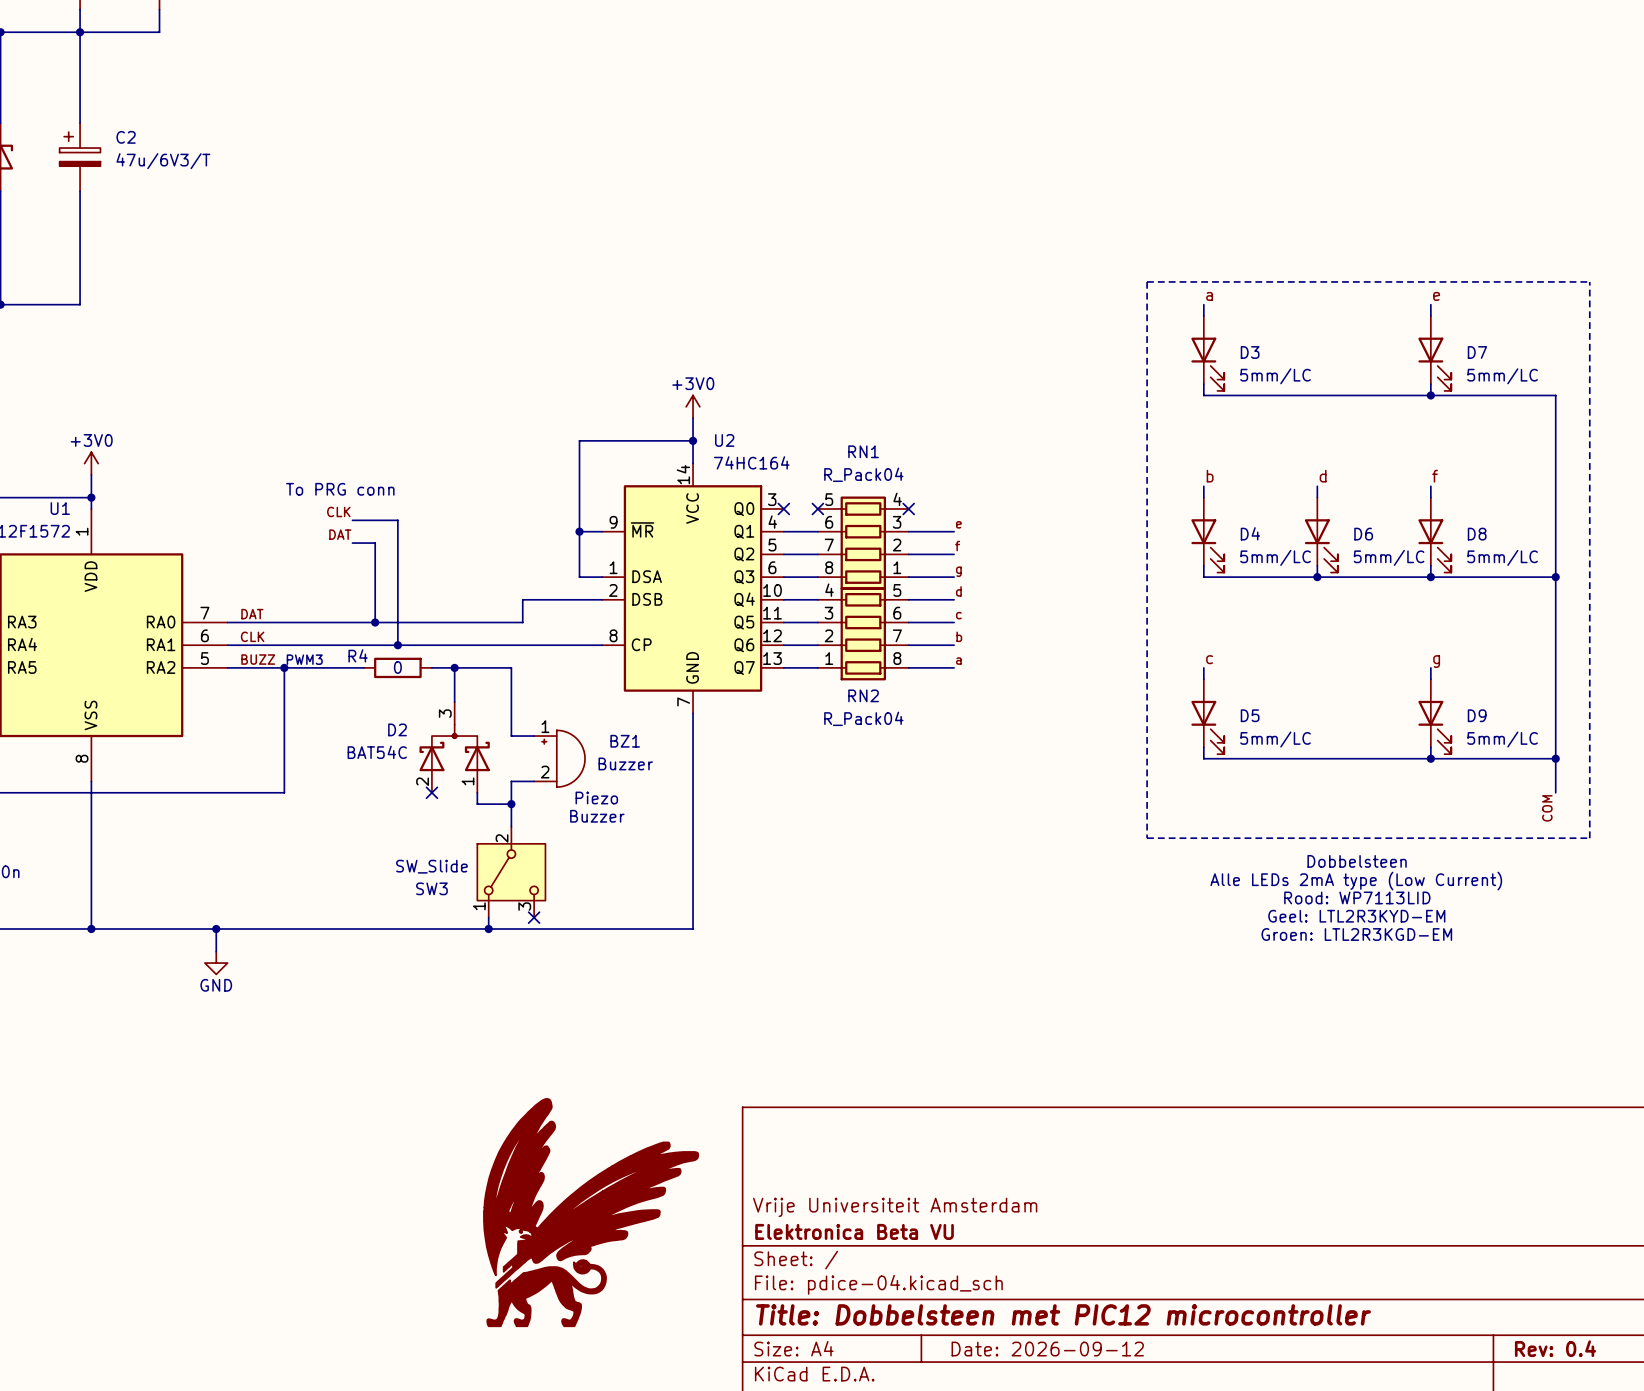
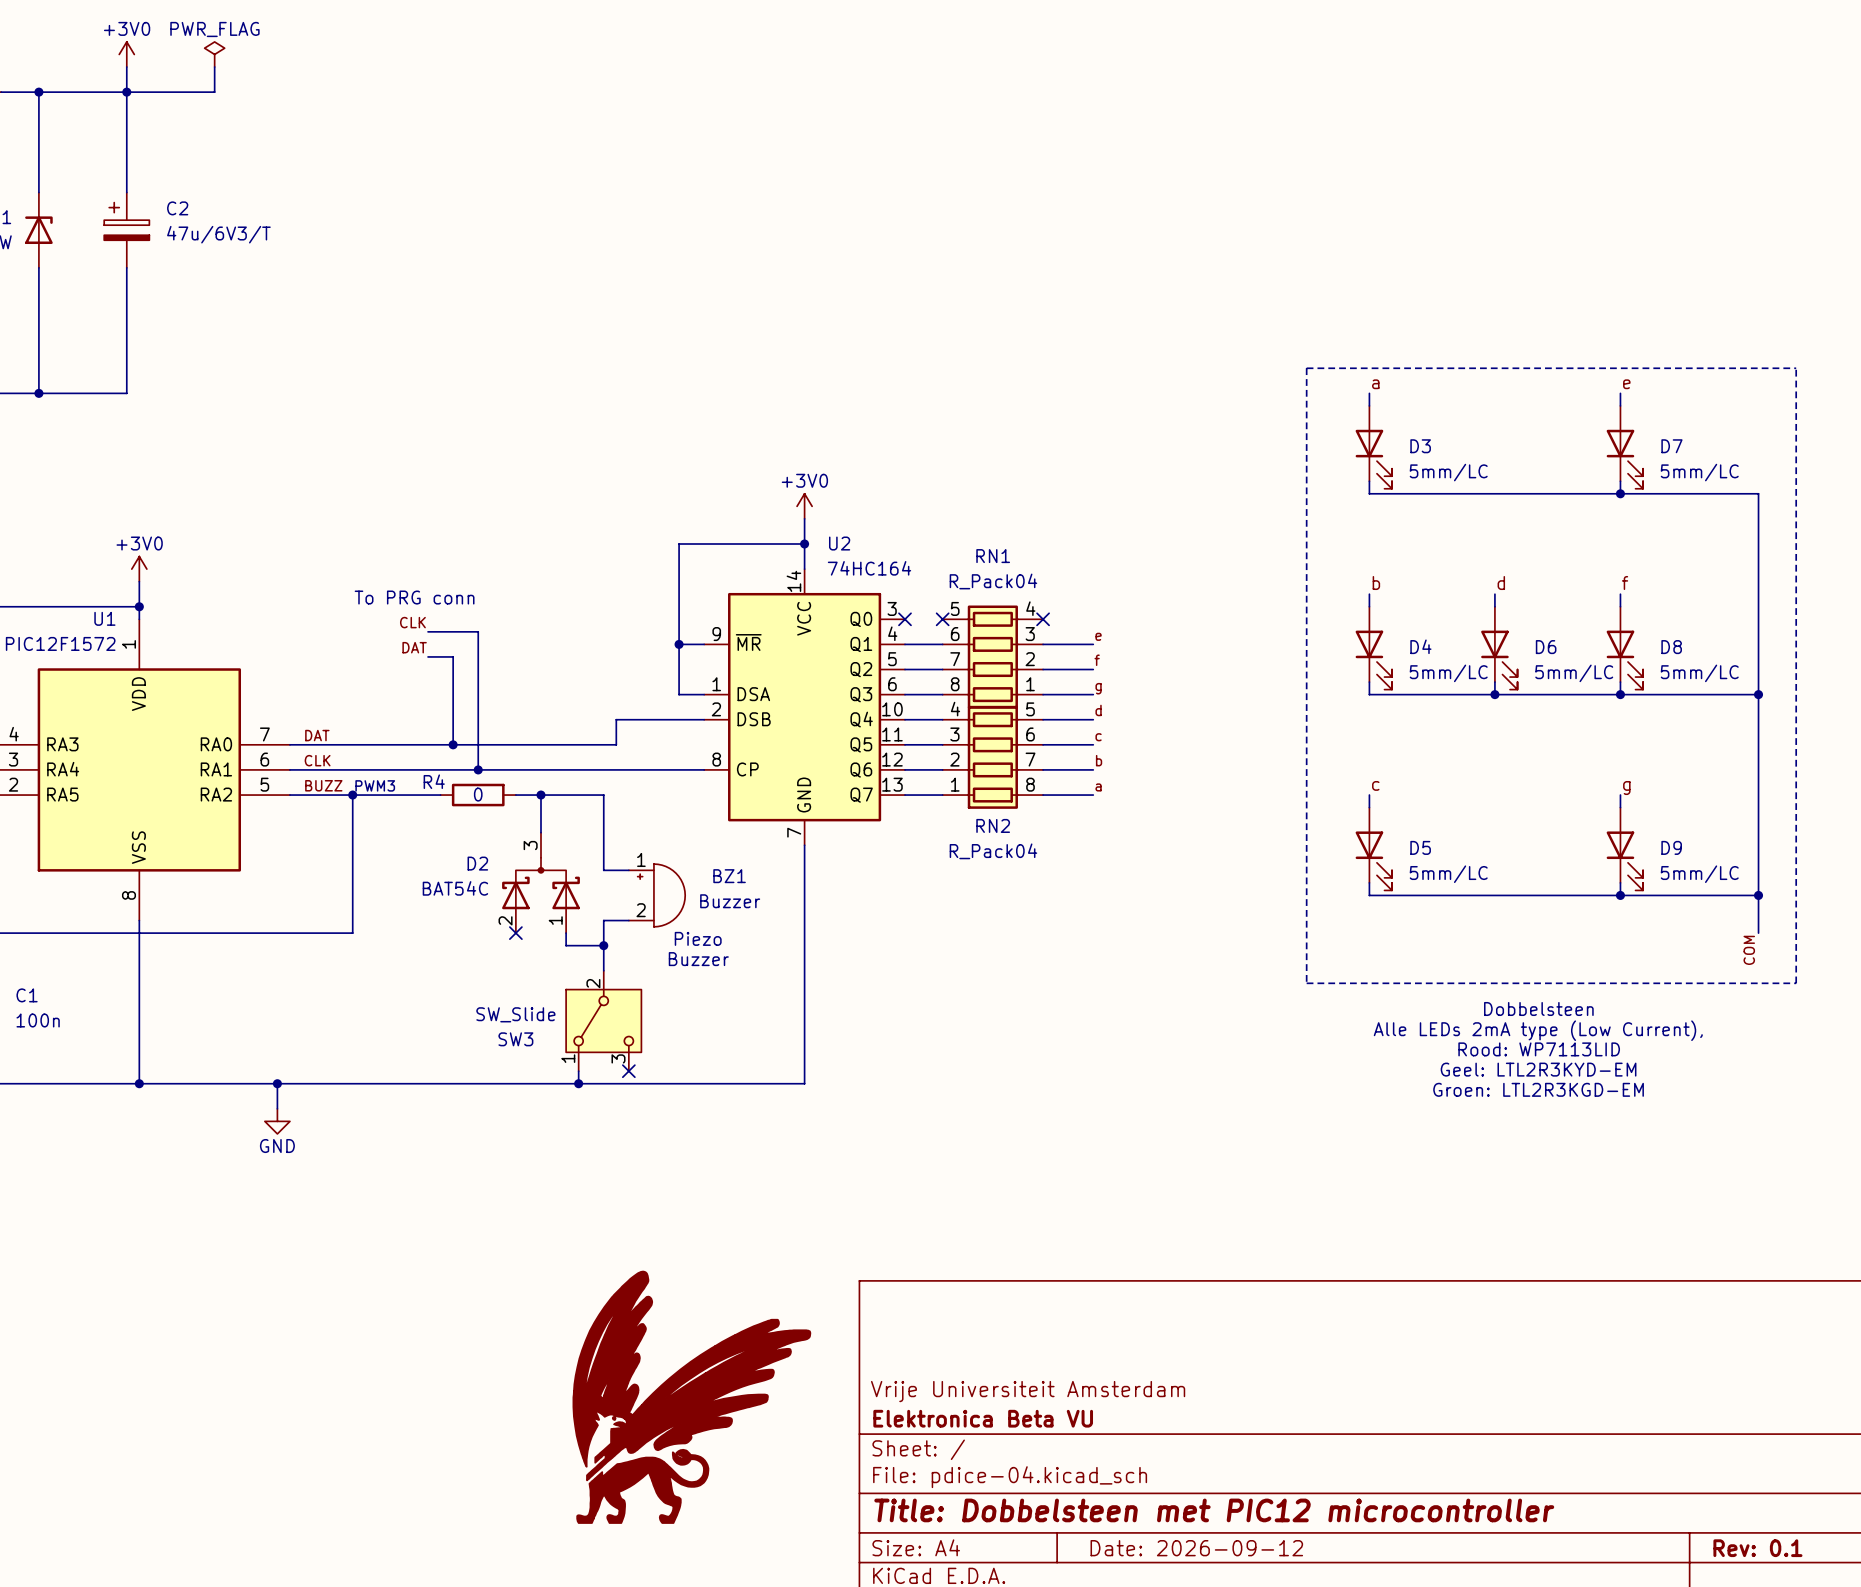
text: Alle LEDs 2mA type (Low Current) (1356, 881) -> Alle LEDs 2mA type (Low Current), (1538, 1030)
title block: Rev: 0.4 (1555, 1348) -> Rev: 0.1 (1757, 1548)

